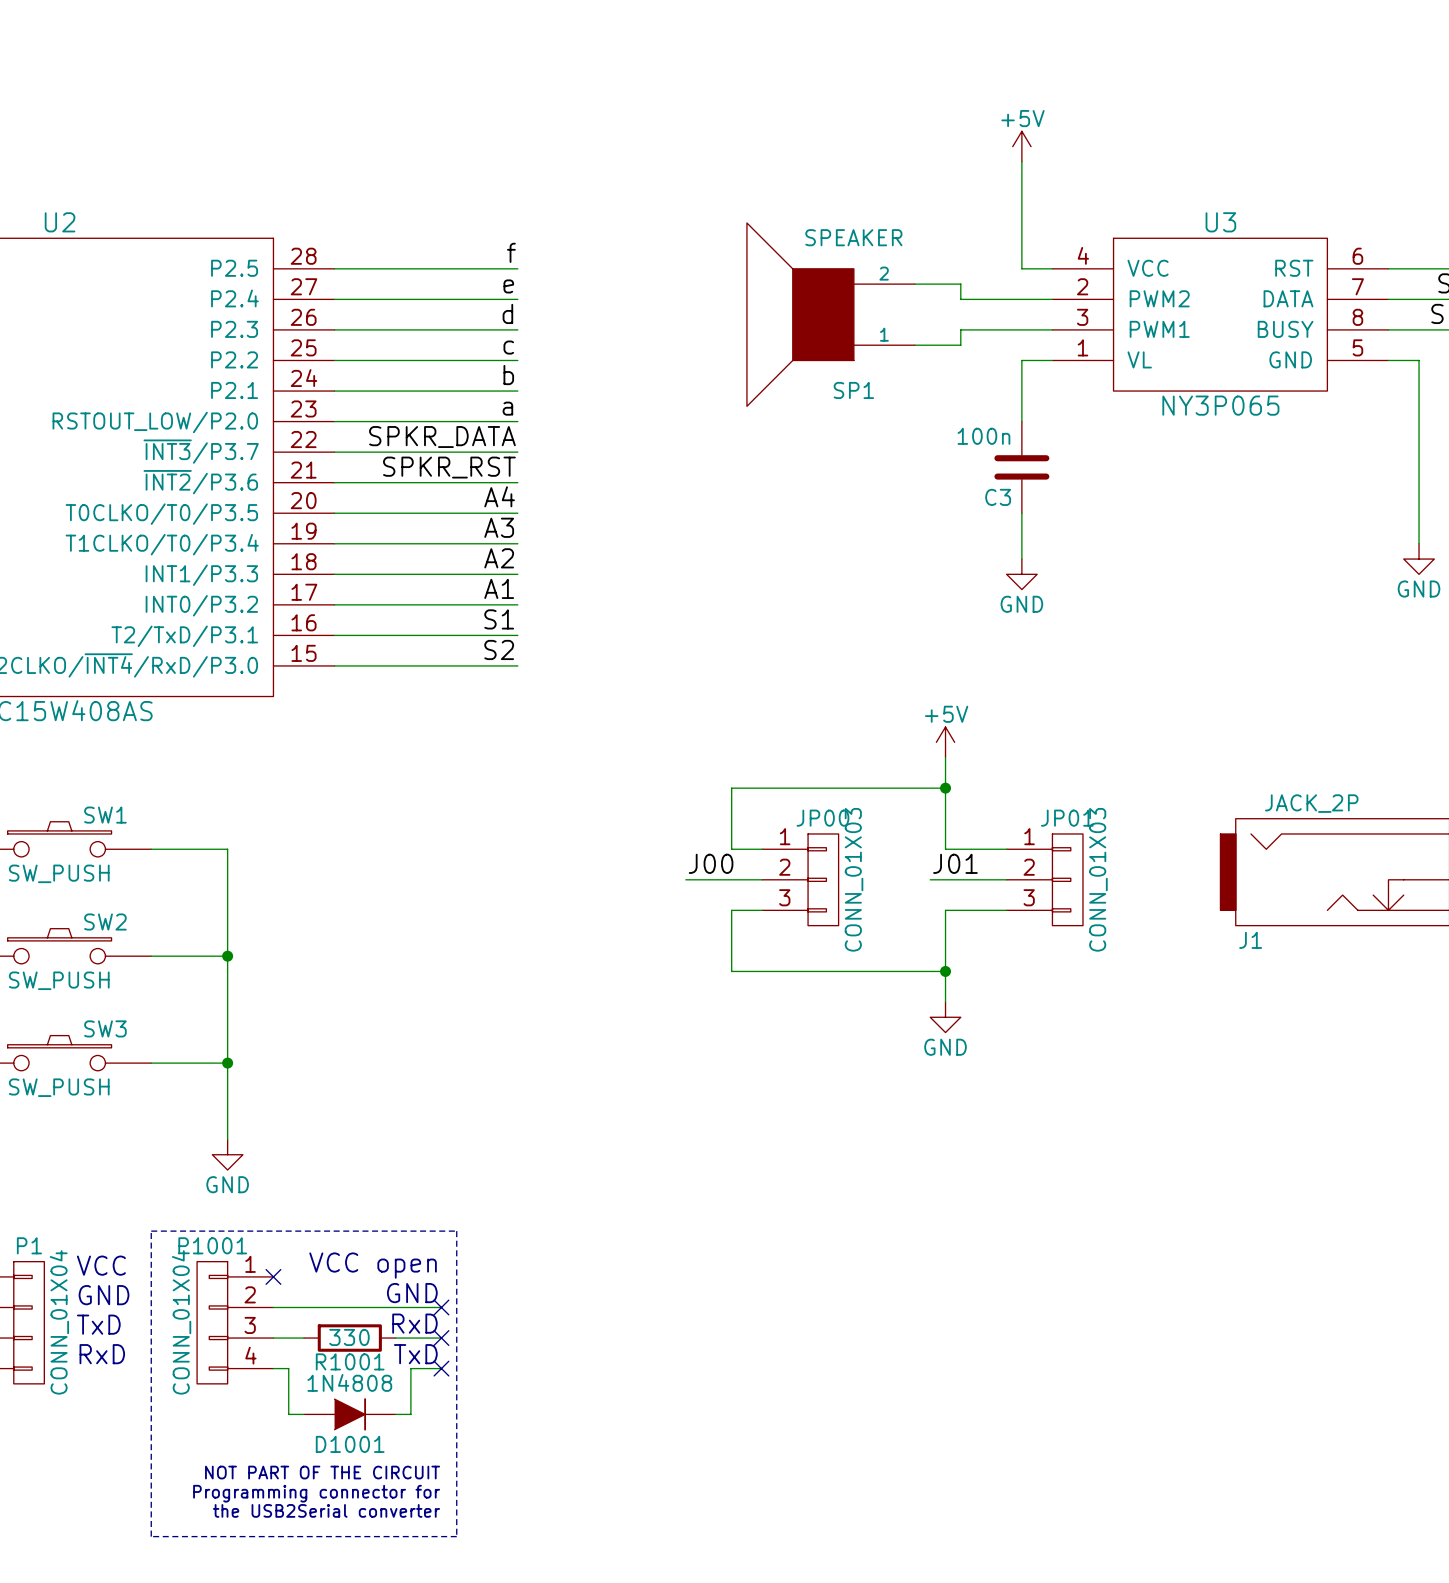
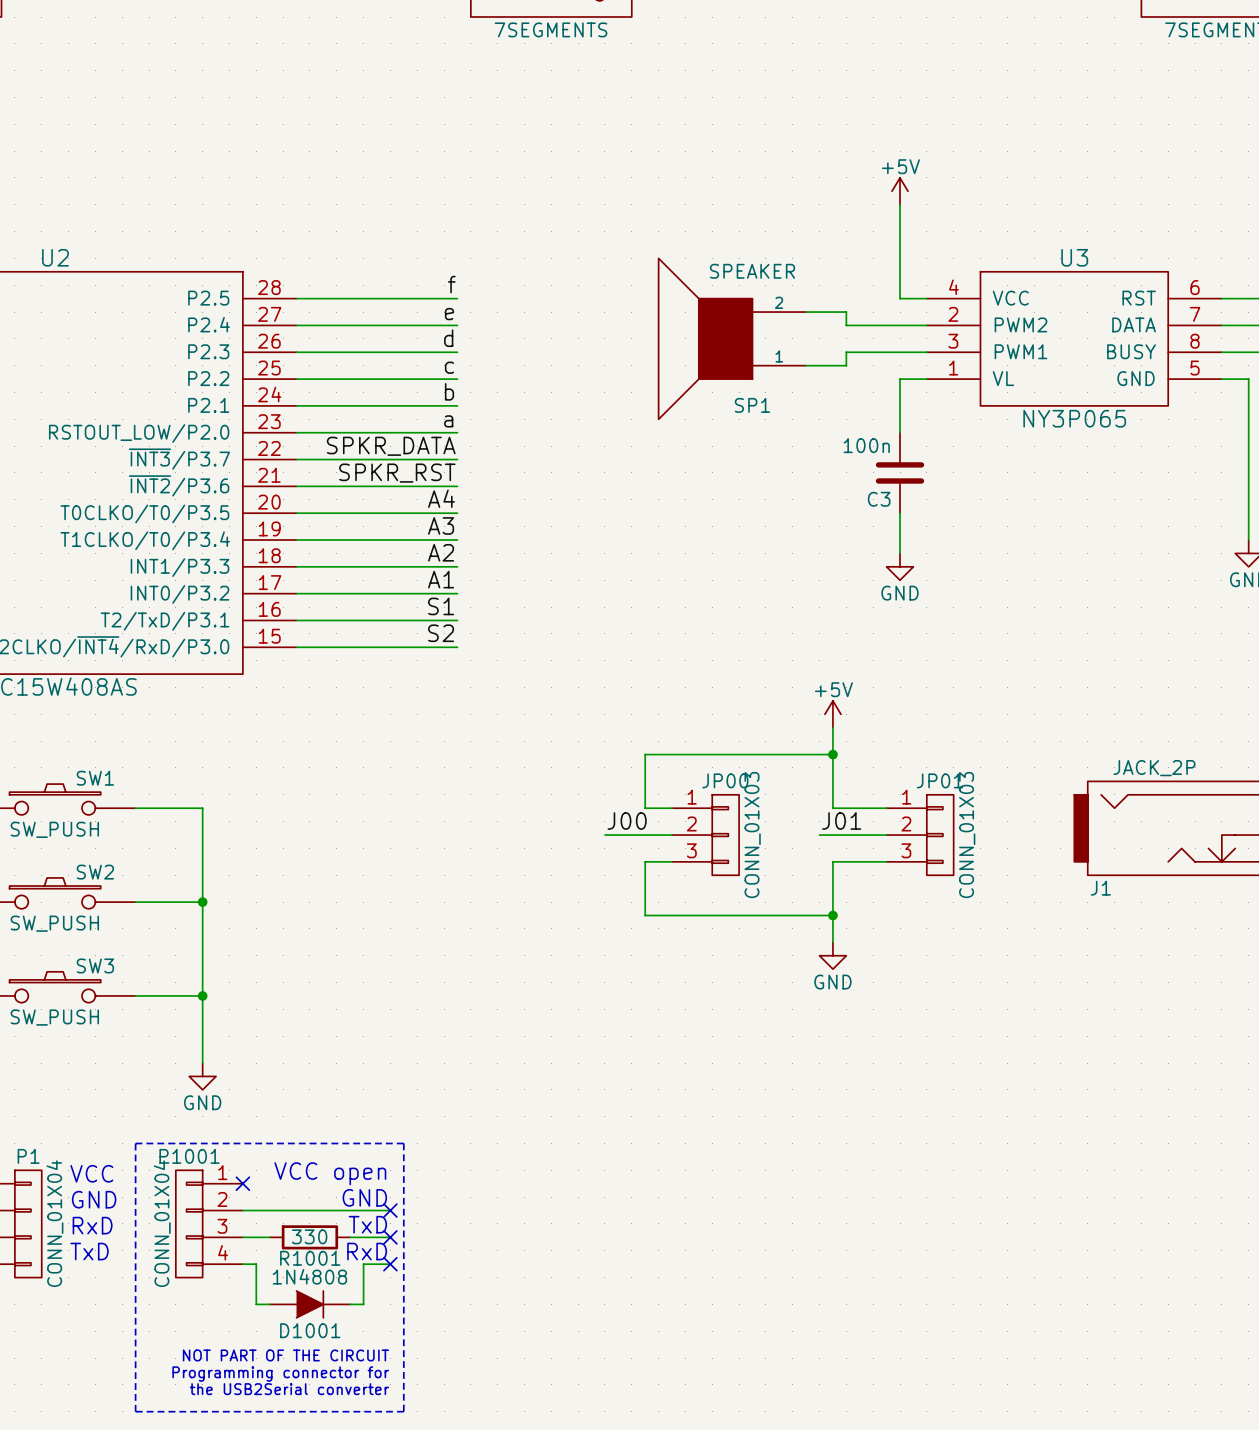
text: RxD (414, 1323) -> TxD (367, 1224)
text: TxD (98, 1324) -> RxD (92, 1225)
text: RxD (102, 1354) -> TxD (89, 1251)
text: TxD (415, 1354) -> RxD (367, 1251)

